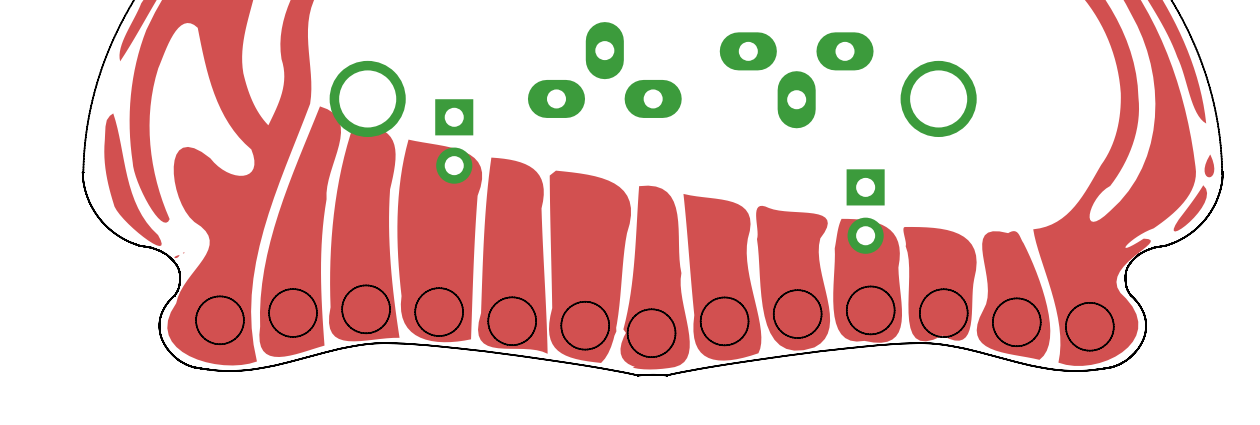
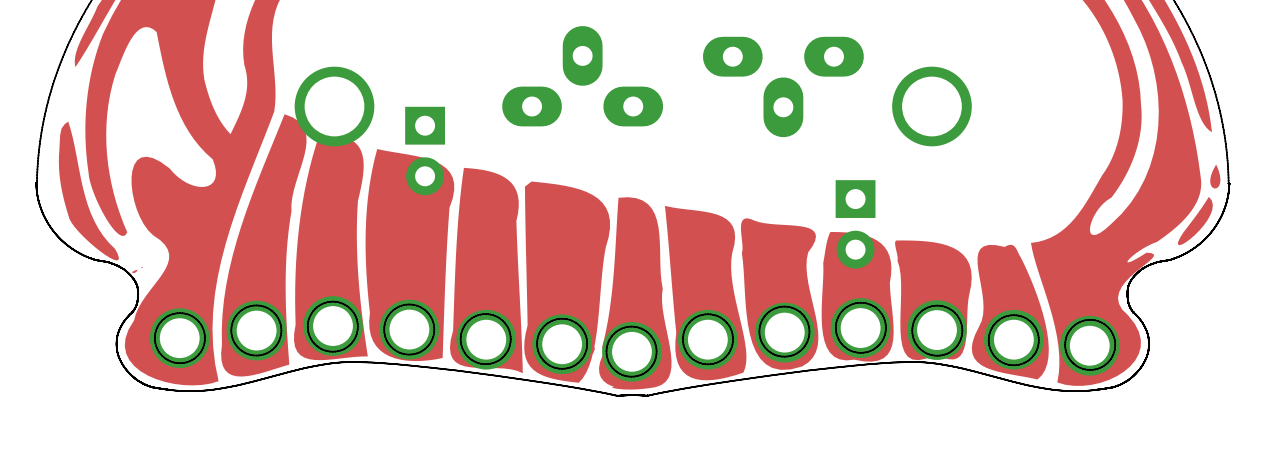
part: none -> (333, 326)
part: none -> (860, 328)
part: none -> (409, 329)
part: none -> (937, 330)
part: none -> (256, 330)
part: none -> (784, 332)
part: none -> (179, 338)
part: none -> (486, 339)
part: none -> (707, 339)
part: none -> (1013, 339)
part: none -> (562, 344)
part: none -> (1089, 345)
part: none -> (631, 351)

